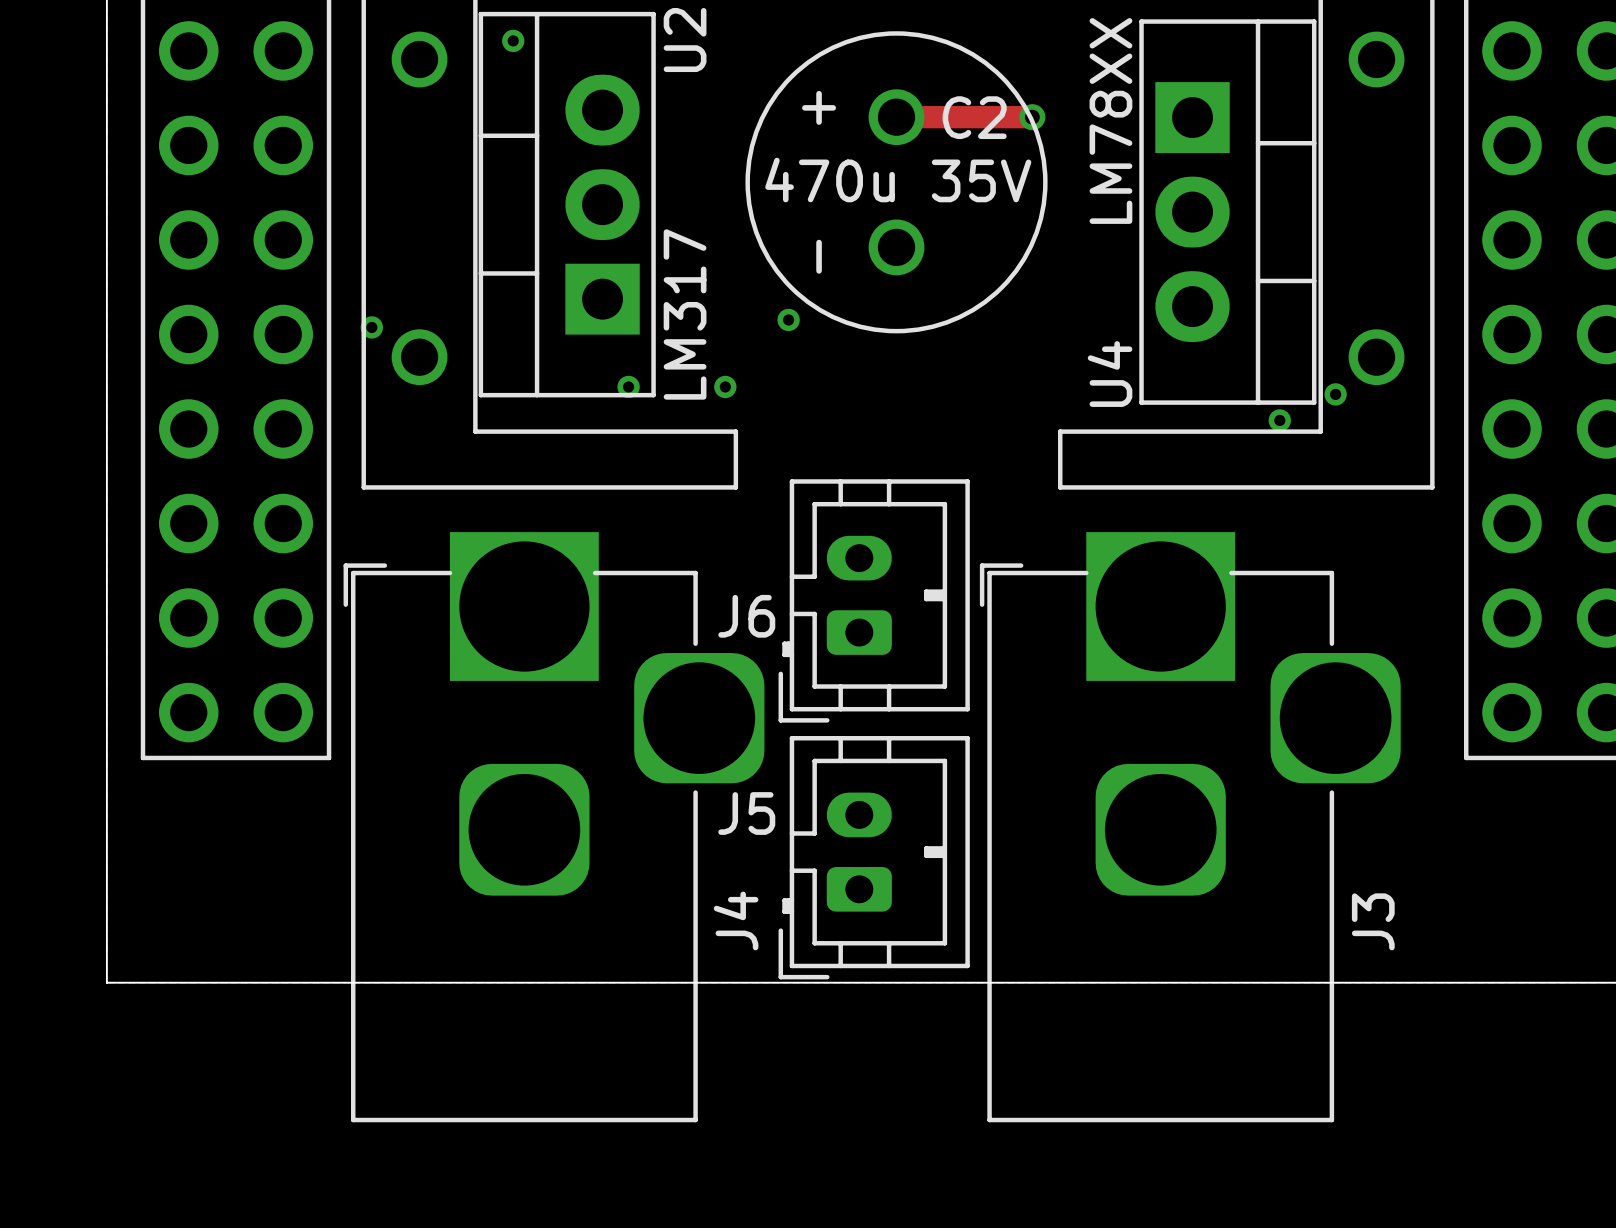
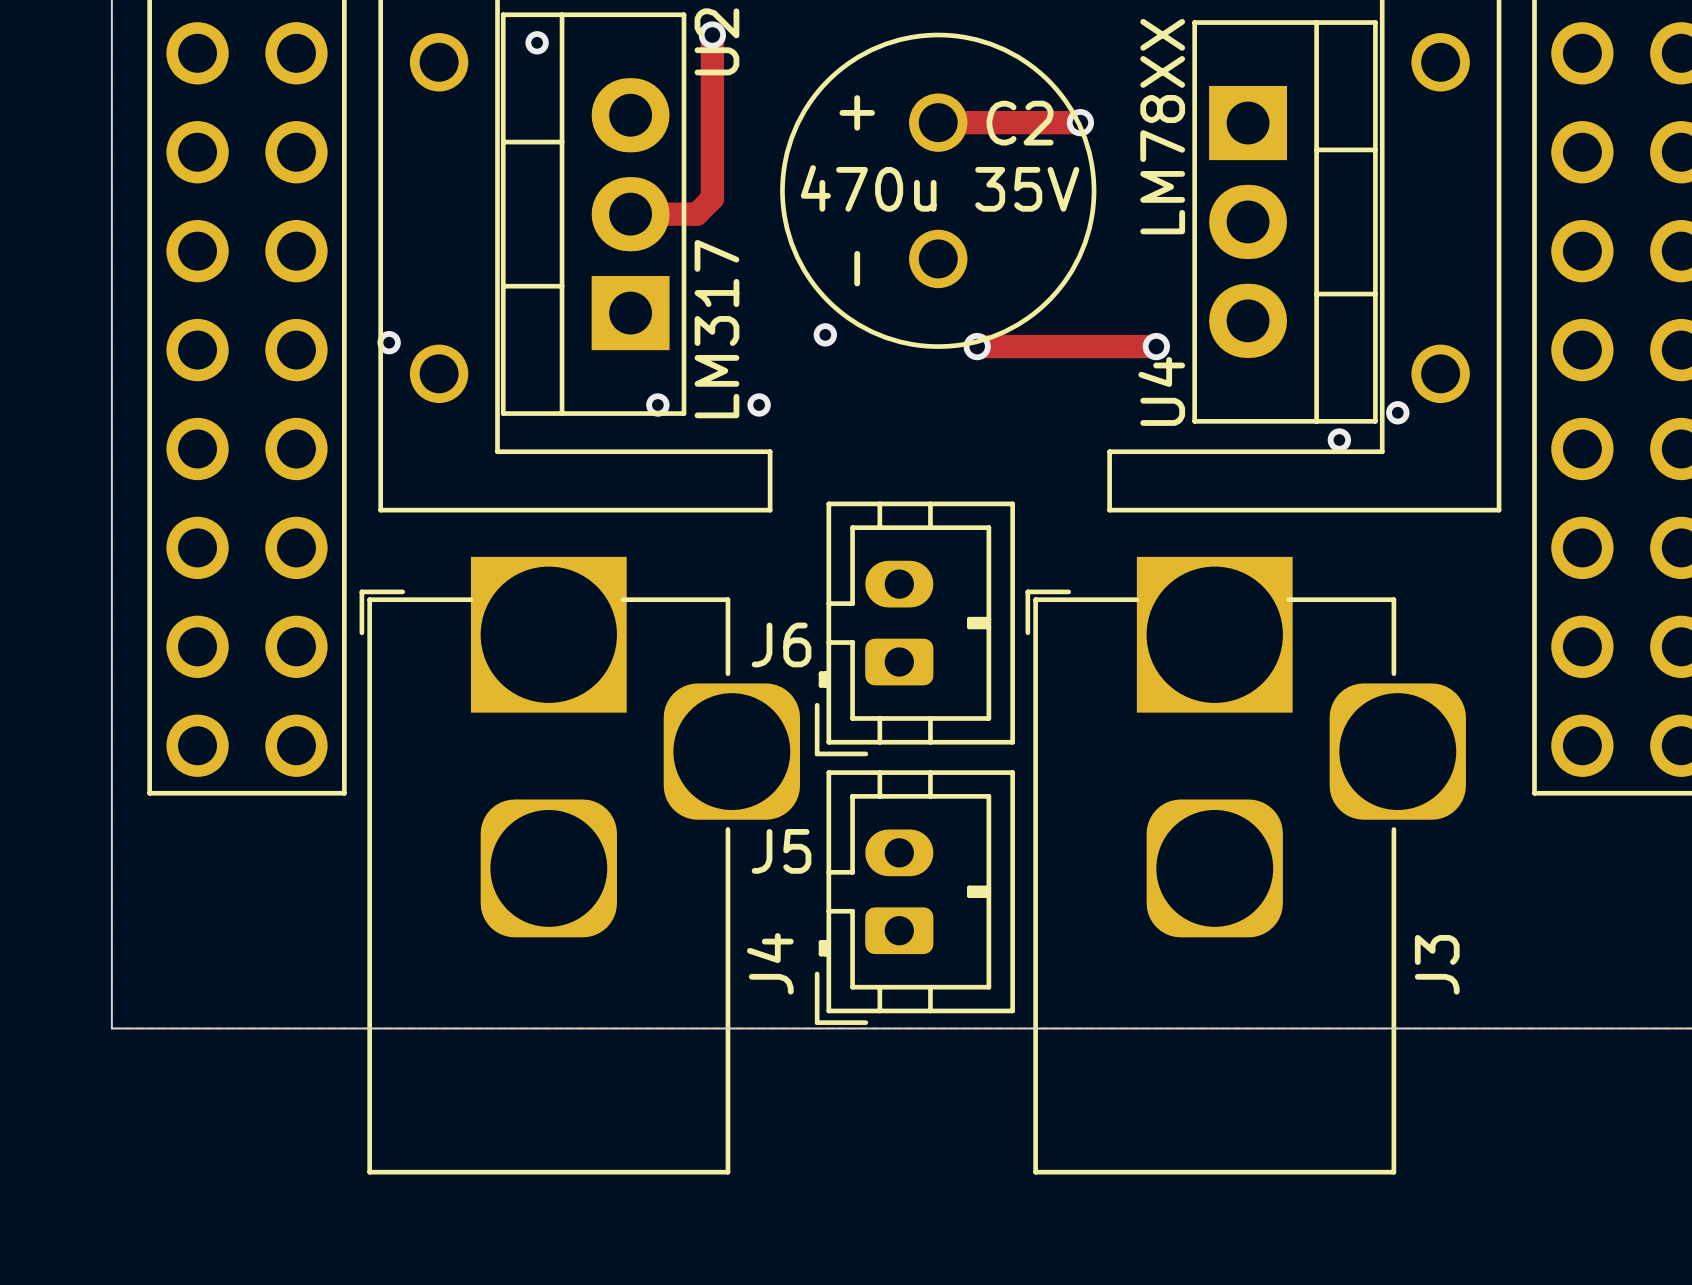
track: none -> (712, 35) (712, 198) (696, 214) (630, 214)
via: none -> (712, 35)
track: none -> (977, 346) (1156, 346)
via: none -> (977, 346)
via: none -> (1156, 346)

